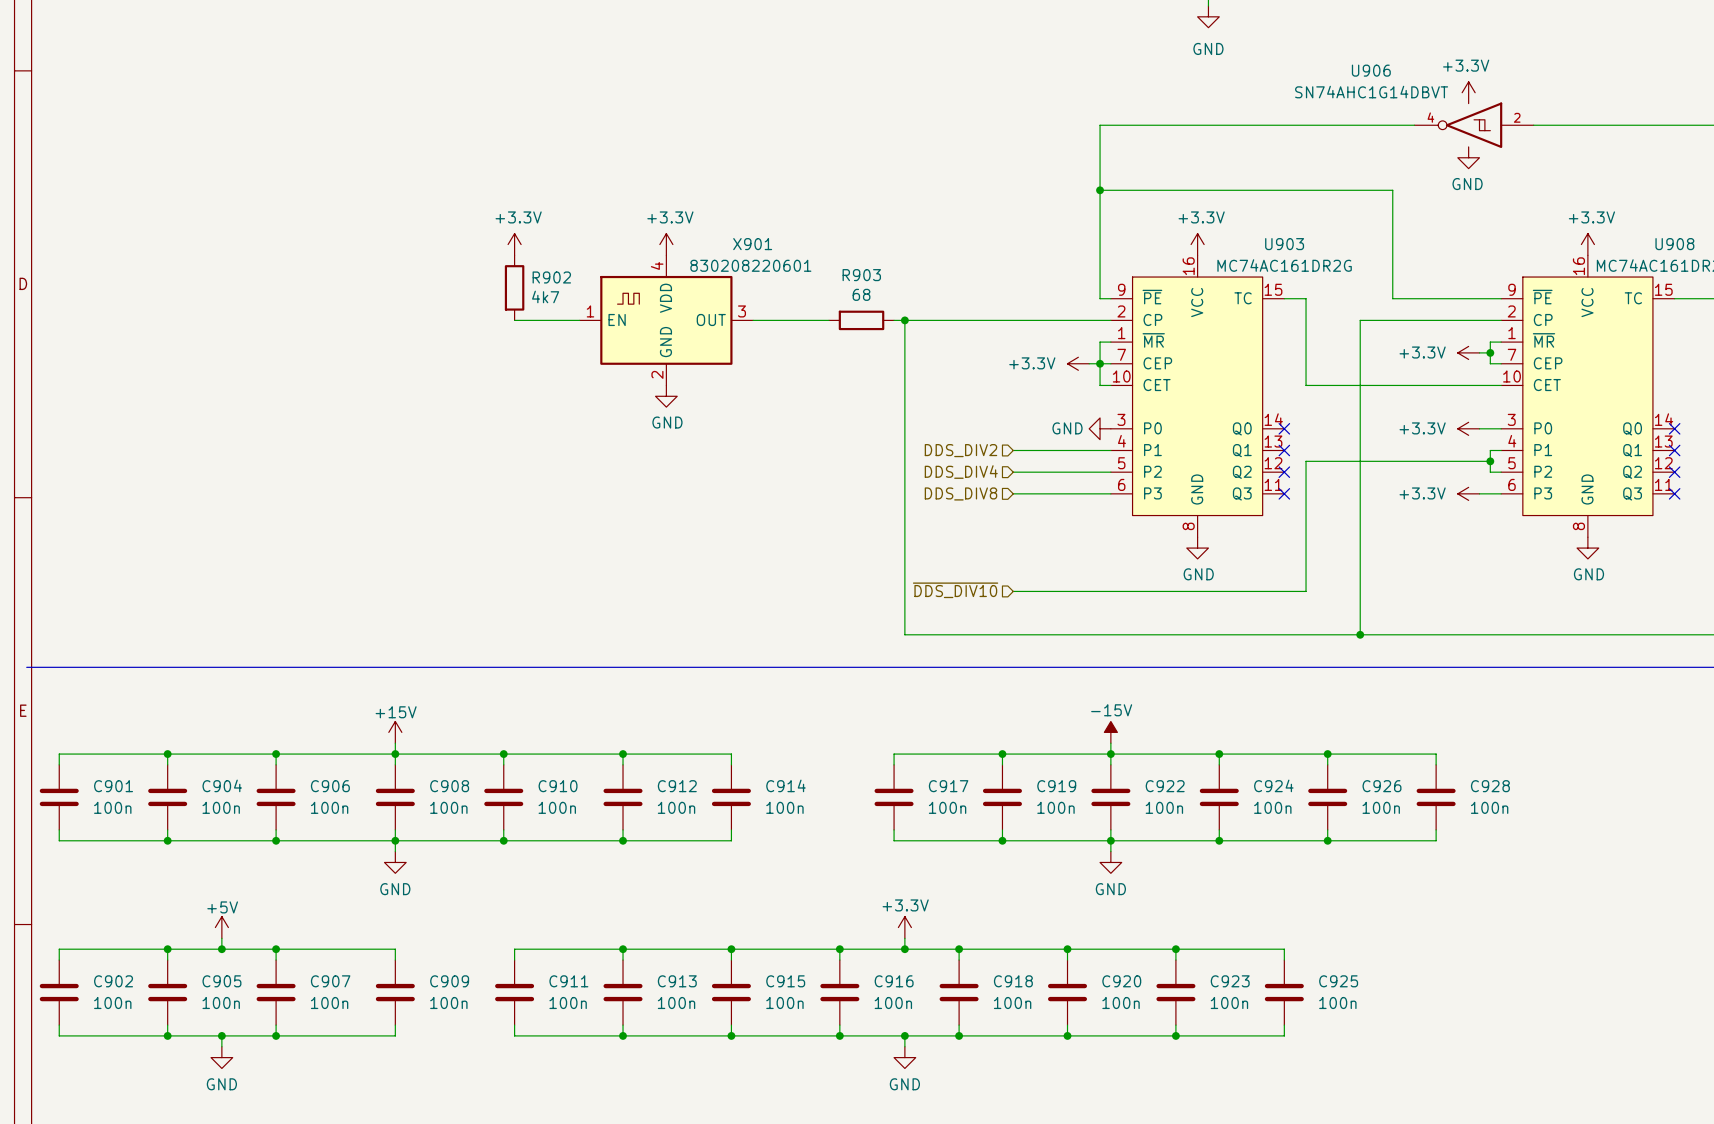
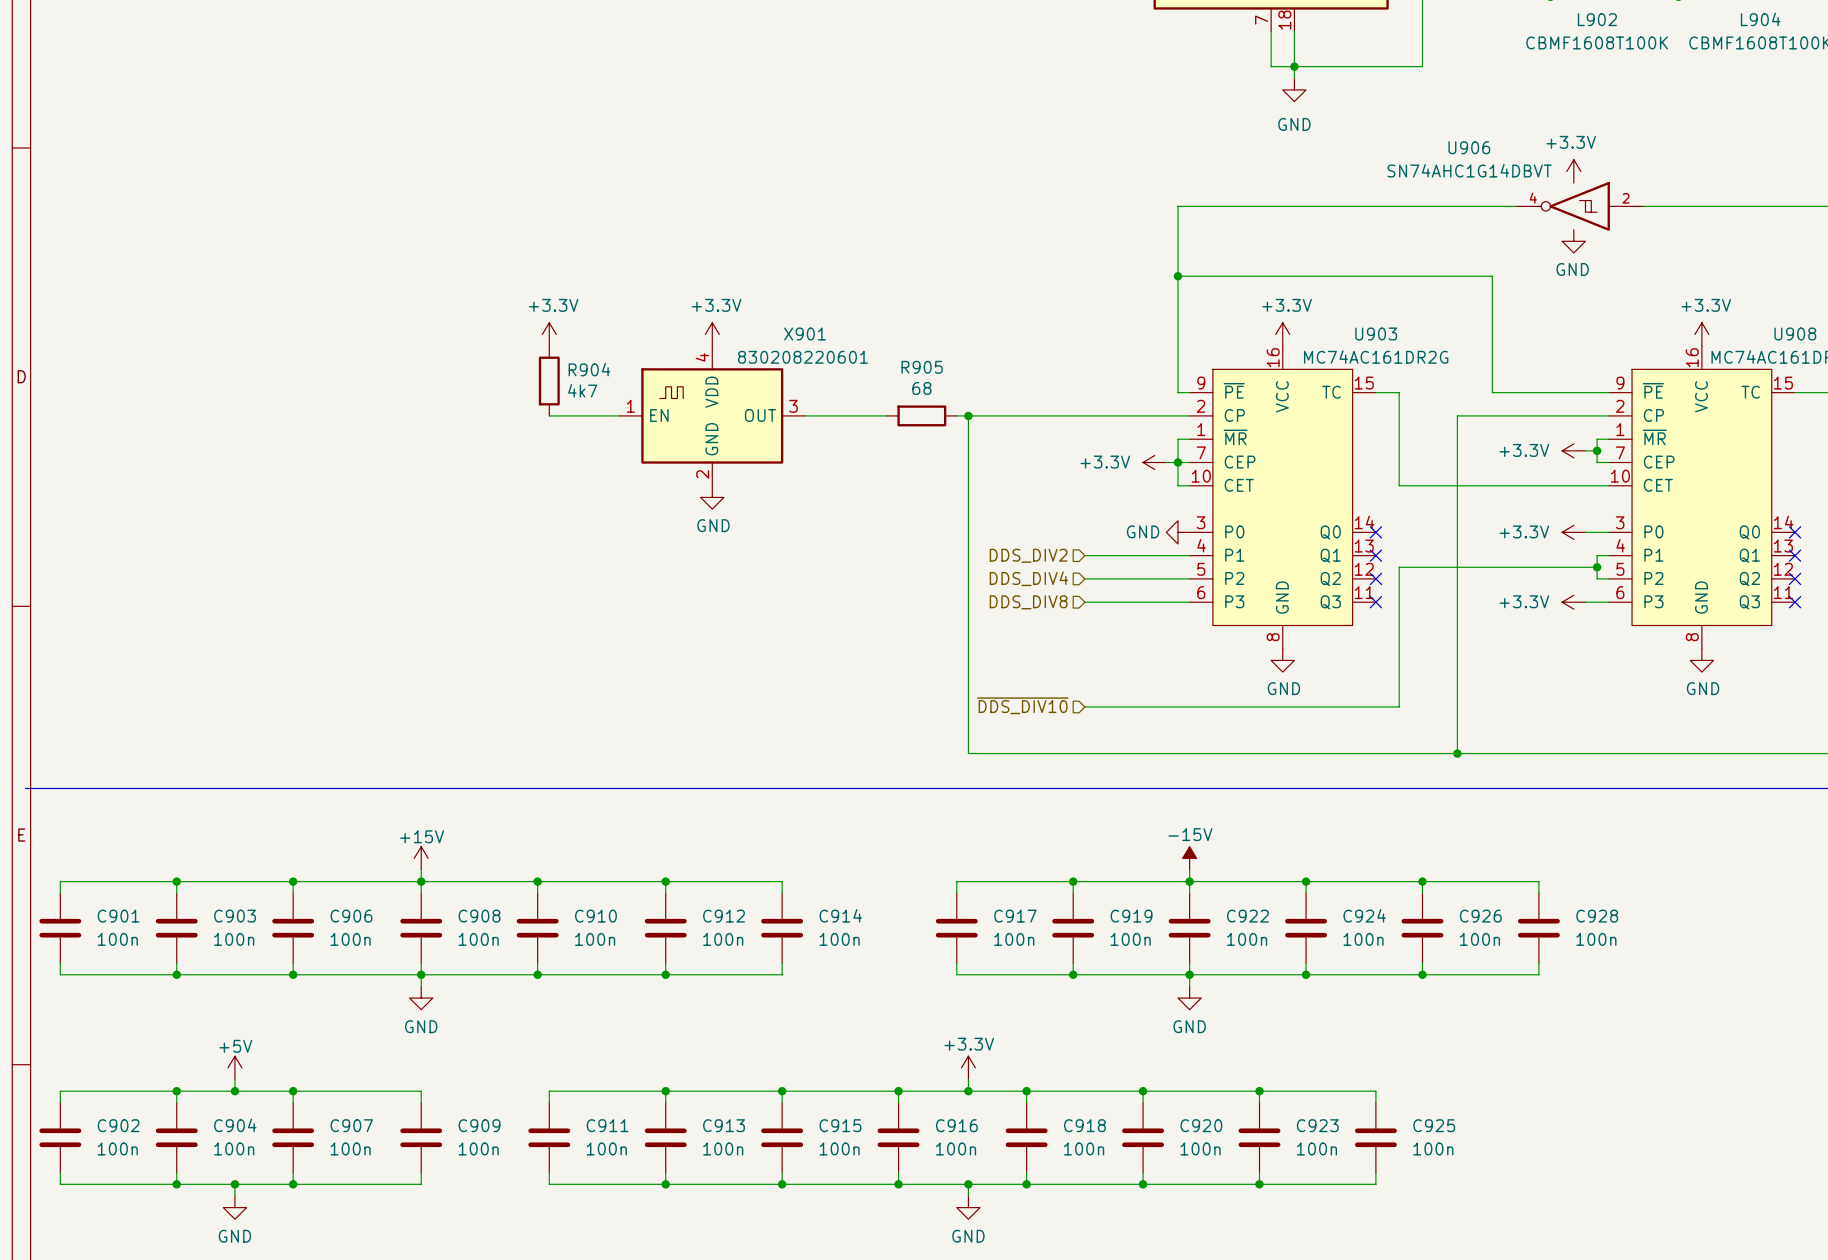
R903 name: R903 (861, 275) -> R905 (922, 367)
R902 name: R902 (551, 277) -> R904 (589, 369)
C904 name: C904 (222, 785) -> C903 (235, 916)
C905 name: C905 (221, 981) -> C904 (235, 1125)

